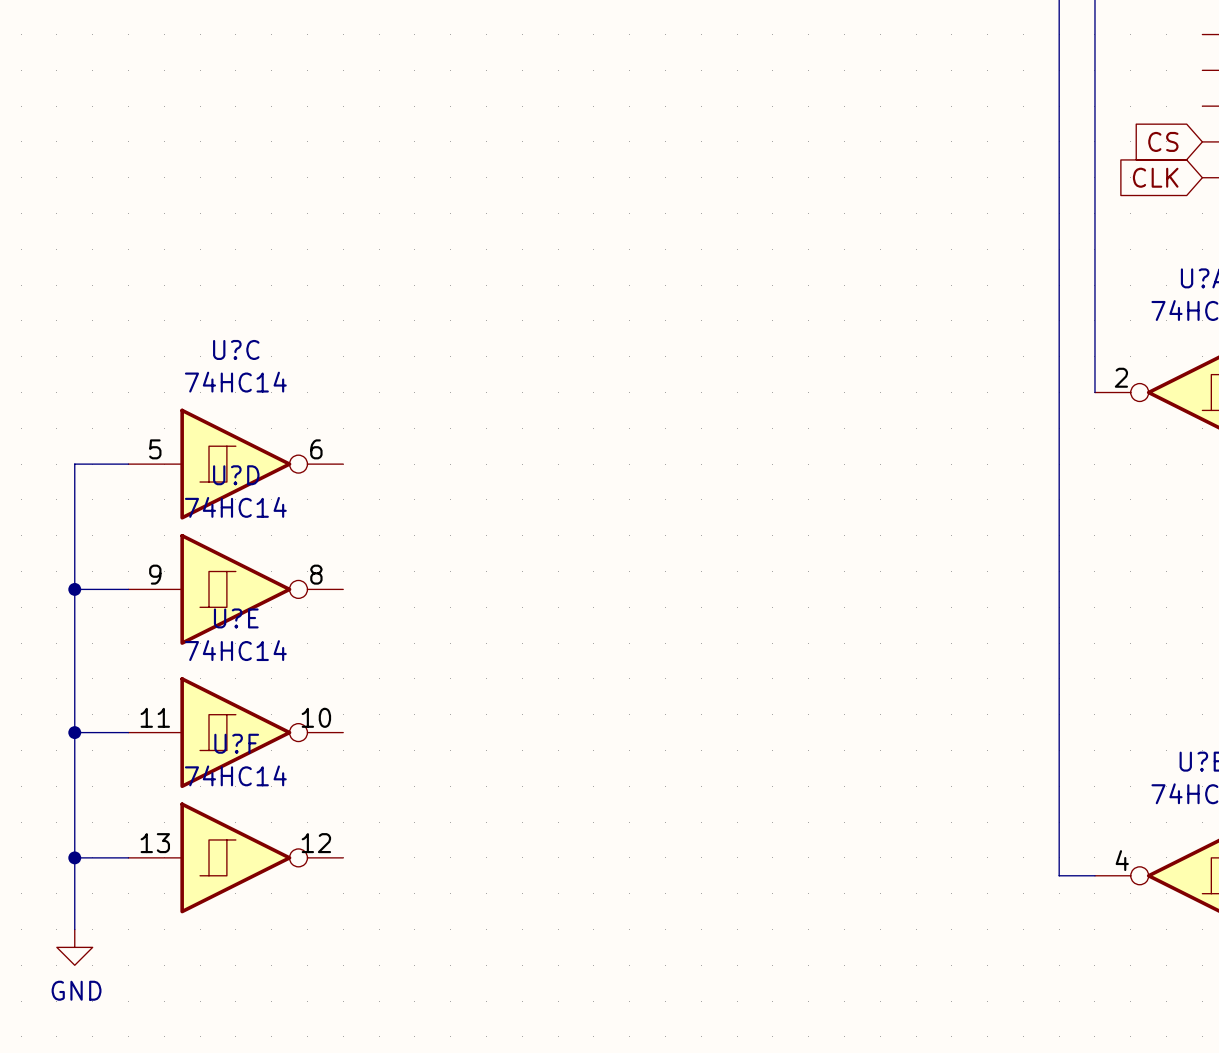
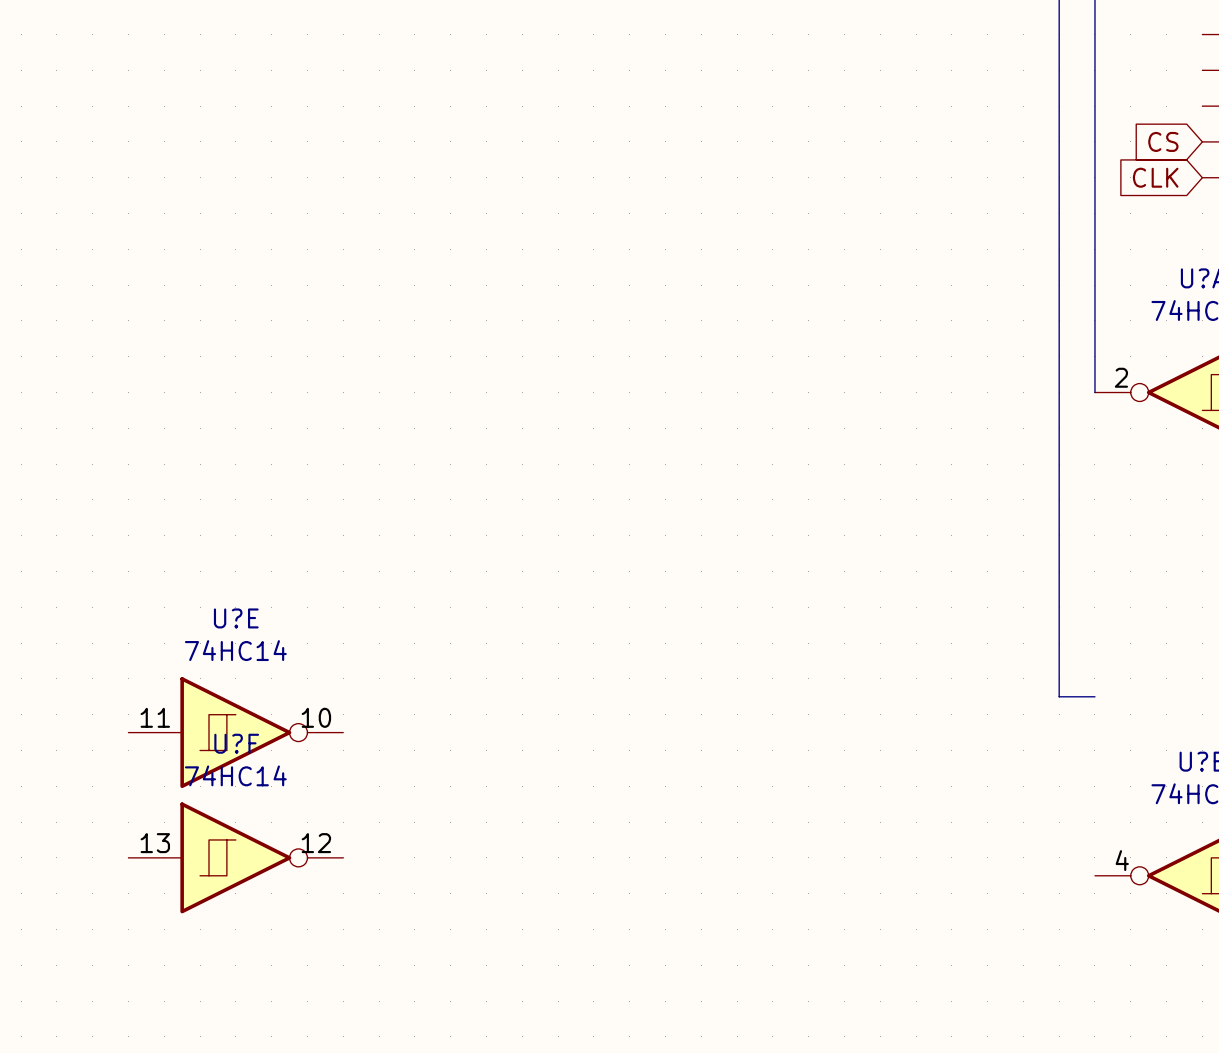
wire: (128, 464) (74, 464) (74, 929) -> none
U?C: 74HC14 (235, 464) -> none
wire: (74, 589) (128, 589) -> none
junction: (74, 589) -> none
U?D: 74HC14 (235, 589) -> none
wire: (1059, 696) (1059, 875) (1094, 875) -> (1059, 696) (1094, 696)
wire: (74, 732) (128, 732) -> none
junction: (74, 732) -> none
wire: (74, 857) (128, 857) -> none
junction: (74, 857) -> none
power symbol: GND (74, 947) -> none

